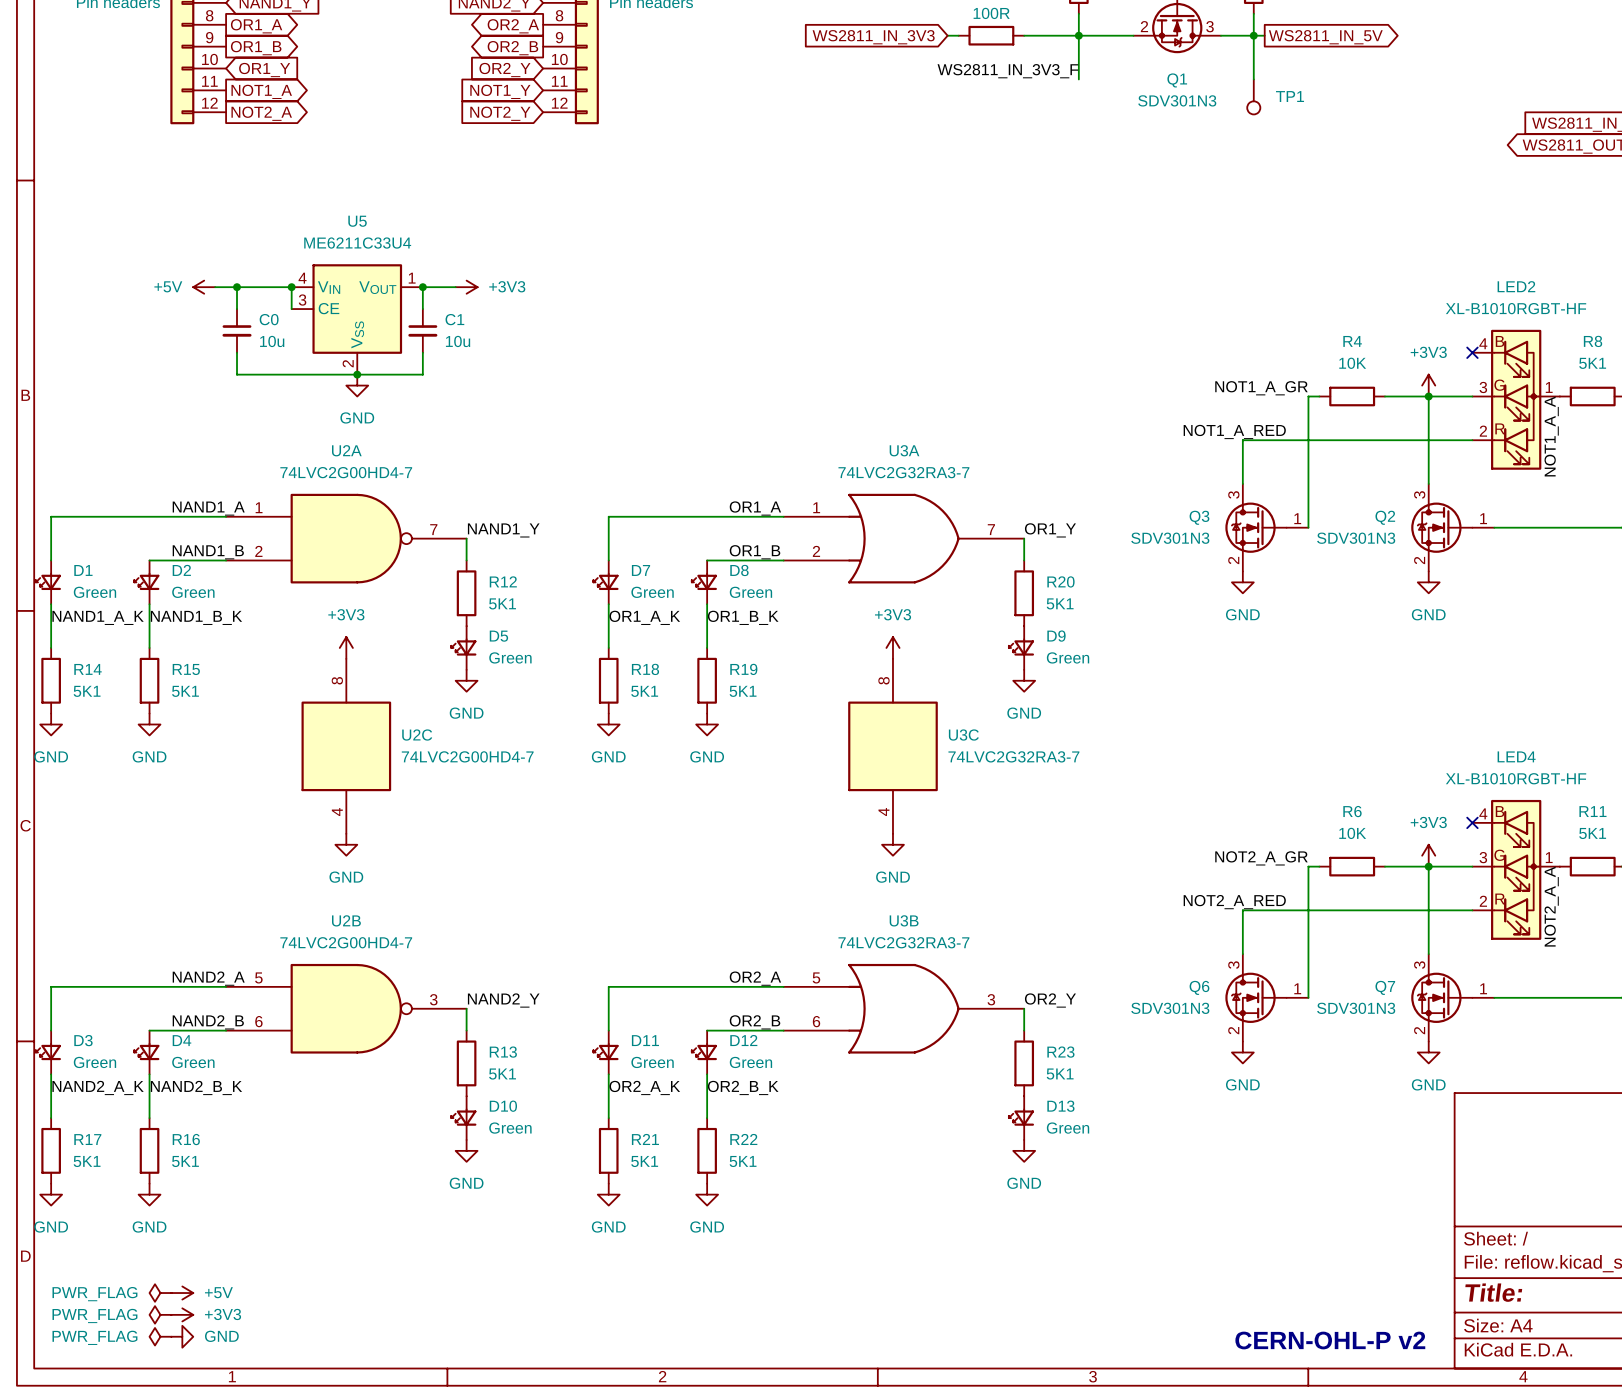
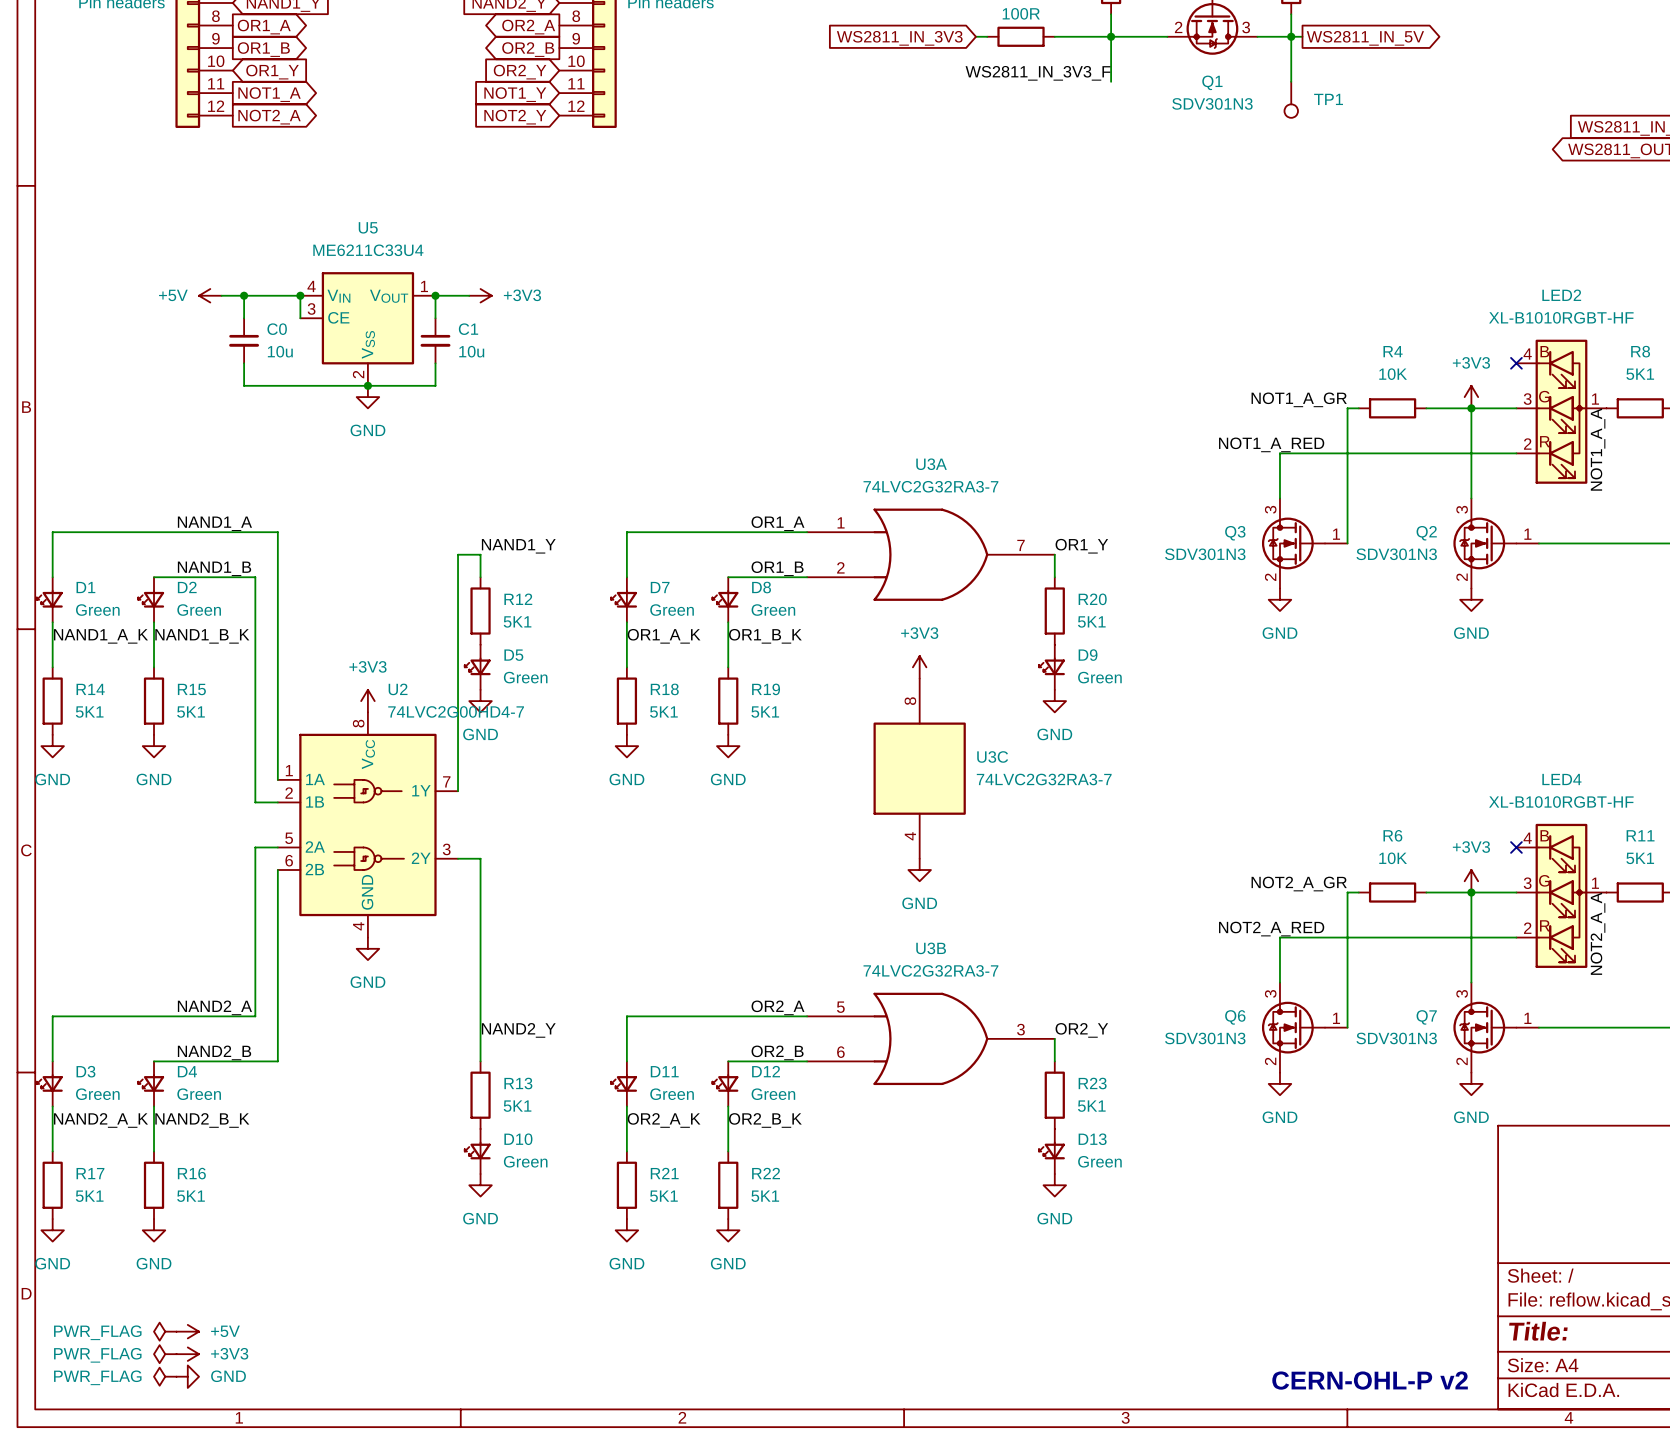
wire: none -> (232, 532) (277, 532) (277, 779)
U2A: 74LVC2G00HD4-7 (346, 538) -> none
wire: none -> (480, 554) (458, 554) (458, 791)
wire: none -> (232, 577) (255, 577) (255, 802) (277, 802)
power symbol position: +3V3 (346, 647) -> +3V3 (367, 701)
U2C: 74LVC2G00HD4-7 (346, 746) -> none
U2: none -> 74LVC2G00HD4-7 (367, 824)
wire: none -> (277, 847) (255, 847) (255, 1016) (232, 1016)
wire: none -> (458, 858) (480, 858) (480, 1038)
wire: none -> (277, 870) (277, 1061) (232, 1061)
power symbol position: GND (346, 844) -> GND (367, 948)
U2B: 74LVC2G00HD4-7 (346, 1008) -> none

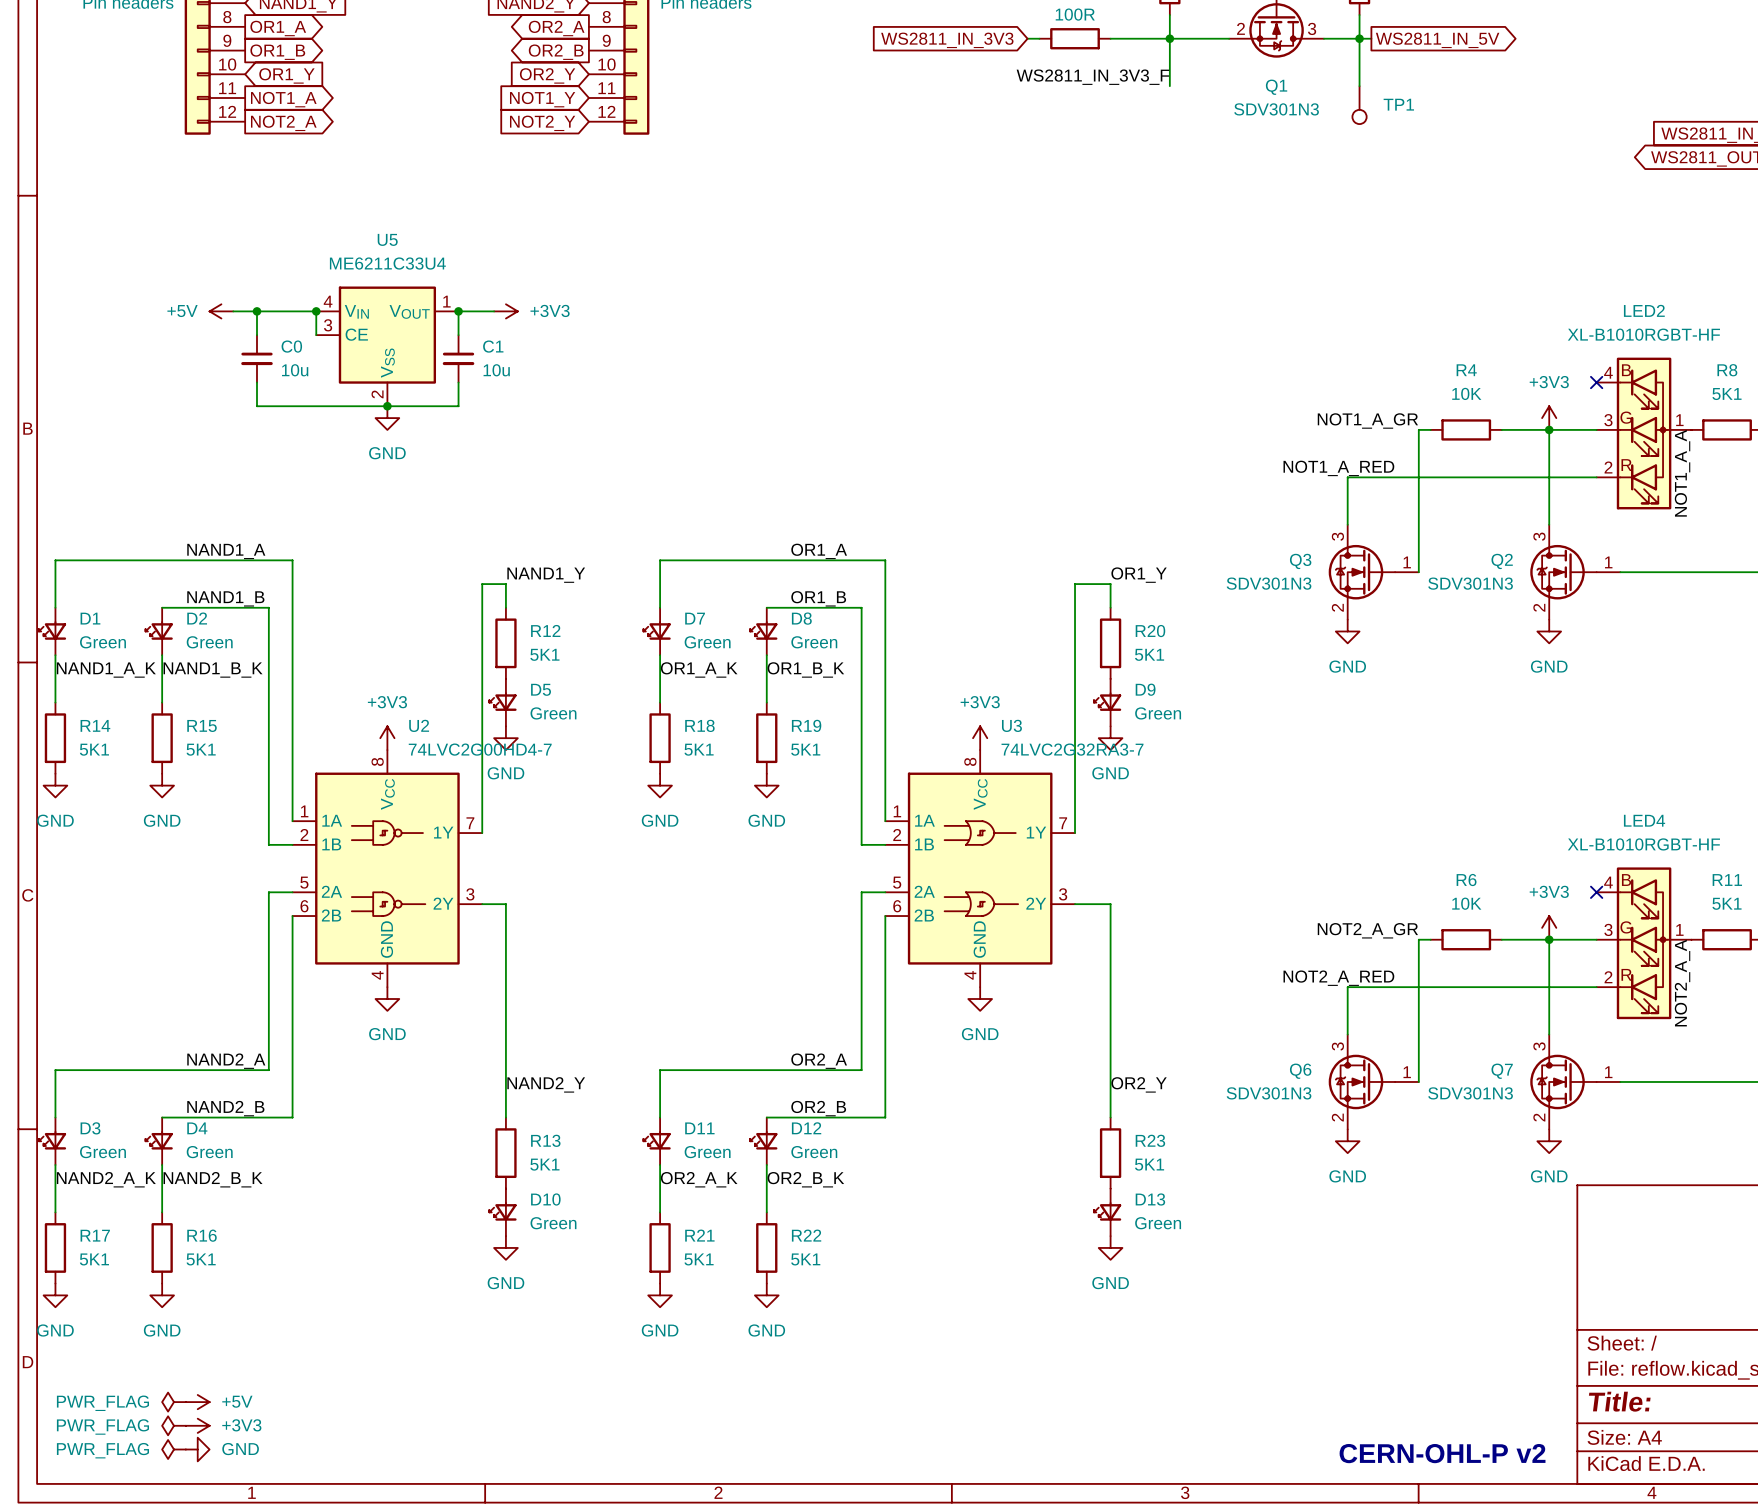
wire: none -> (849, 560) (885, 560) (885, 821)
U3A: 74LVC2G32RA3-7 (930, 554) -> none
wire: none -> (1110, 584) (1075, 584) (1075, 833)
wire: none -> (849, 607) (861, 607) (861, 844) (885, 844)
power symbol position: +3V3 (919, 667) -> +3V3 (980, 738)
U3C: 74LVC2G32RA3-7 (919, 768) -> none
U3: none -> 74LVC2G32RA3-7 (980, 868)
wire: none -> (885, 892) (861, 892) (861, 1070) (849, 1070)
wire: none -> (1075, 904) (1110, 904) (1110, 1093)
wire: none -> (885, 916) (885, 1117) (849, 1117)
power symbol position: GND (919, 870) -> GND (980, 999)
U3B: 74LVC2G32RA3-7 (930, 1038) -> none

